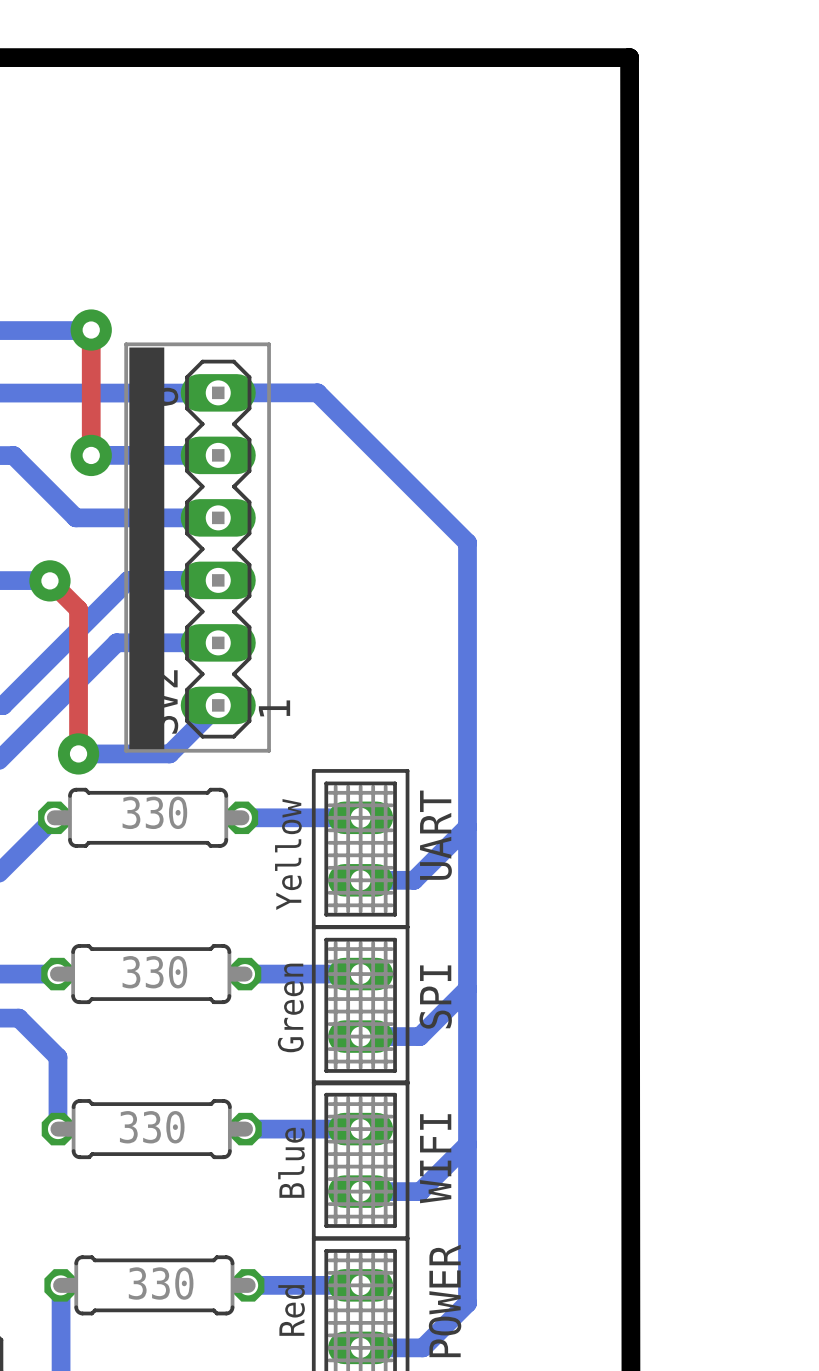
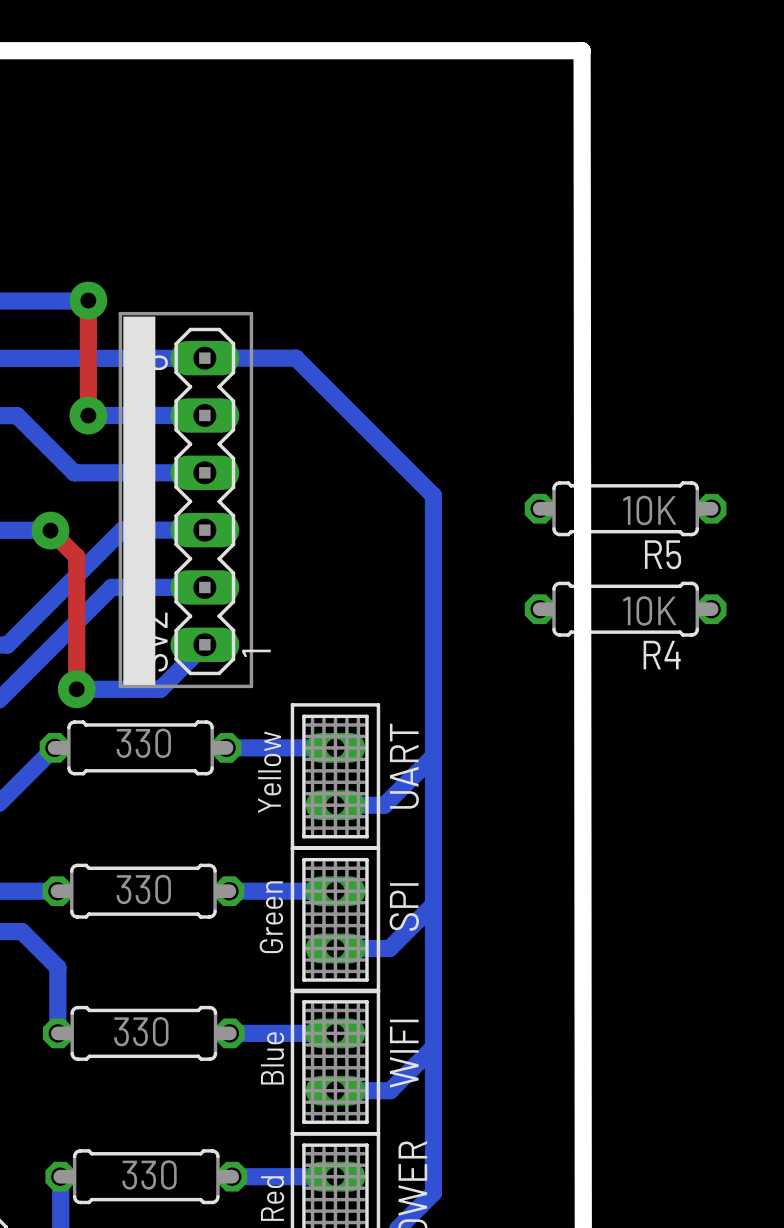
R5: none -> 10K (625, 508)
R4: none -> 10K (625, 609)

